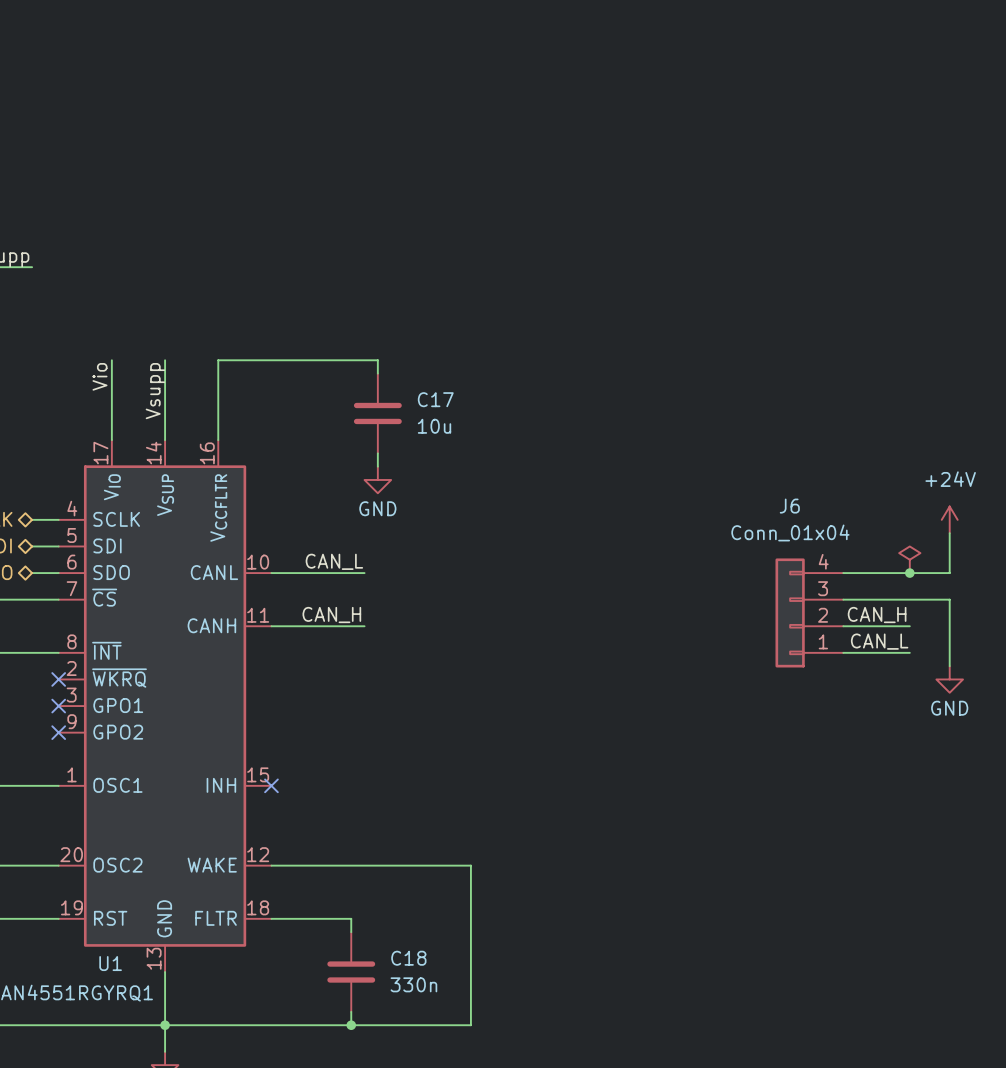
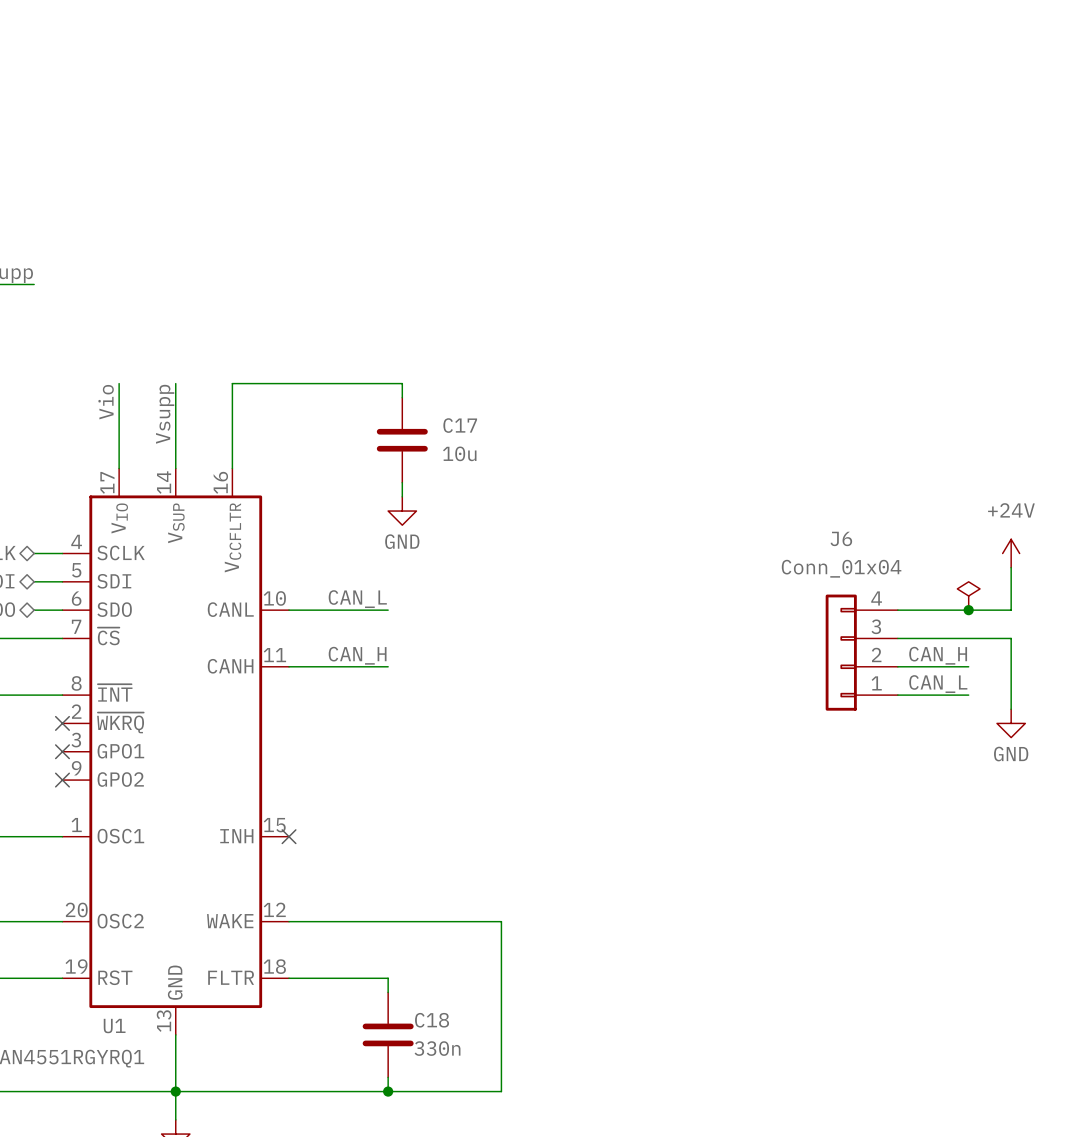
wire: (351, 918) (351, 932) -> (373, 978) (388, 978) (388, 992)
C18 position: (351, 972) -> (388, 1034)
wire: (351, 1011) (351, 1025) -> (388, 1077) (388, 1091)
junction position: (351, 1025) -> (388, 1091)

